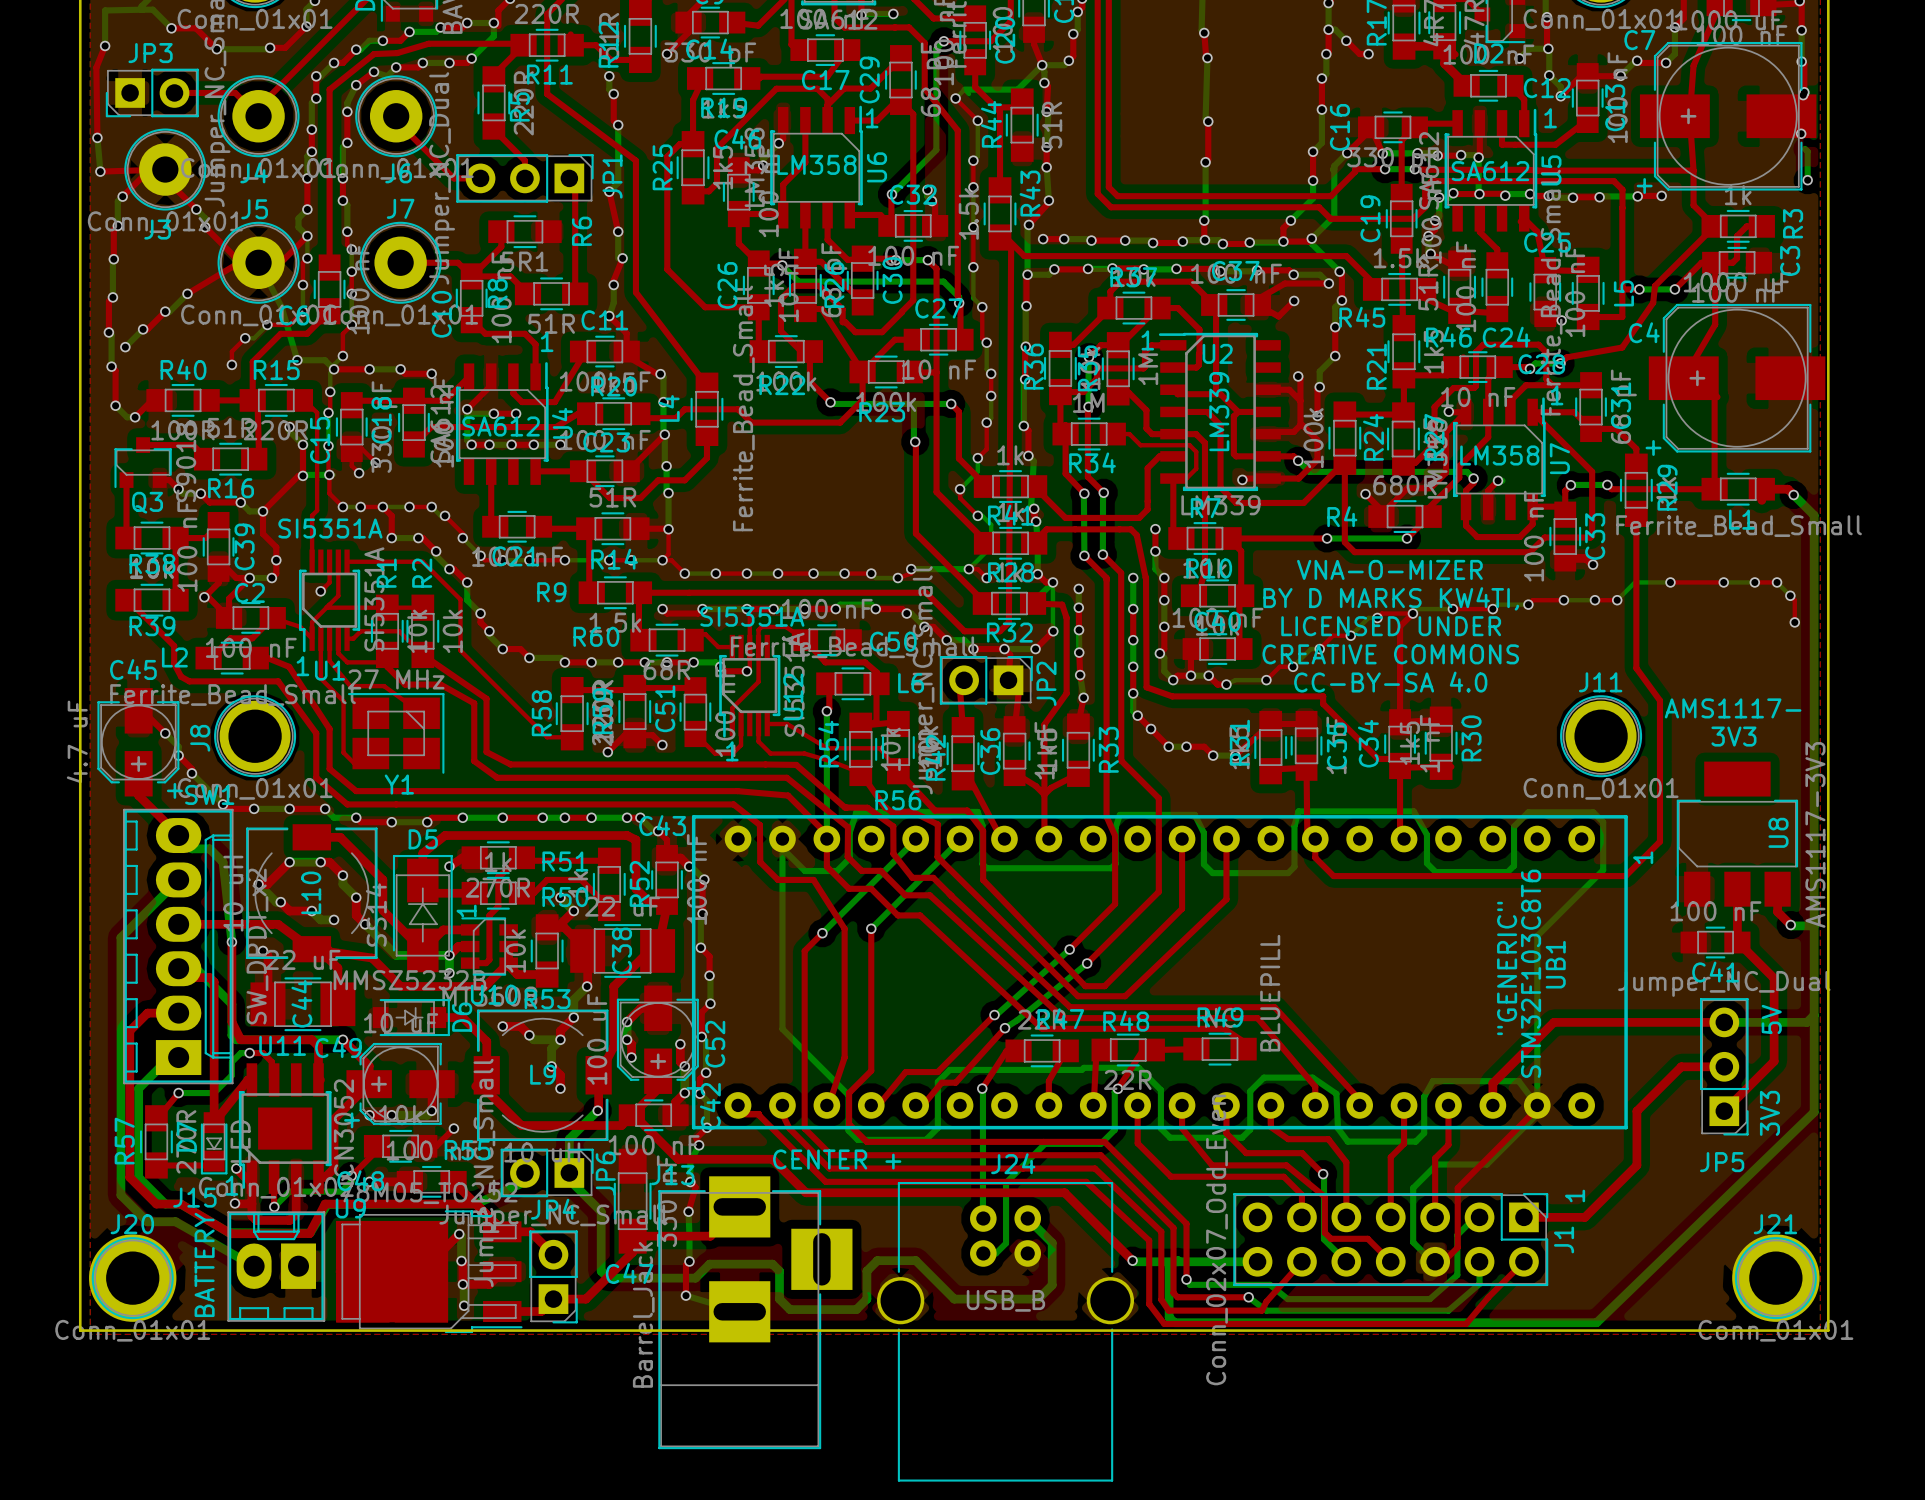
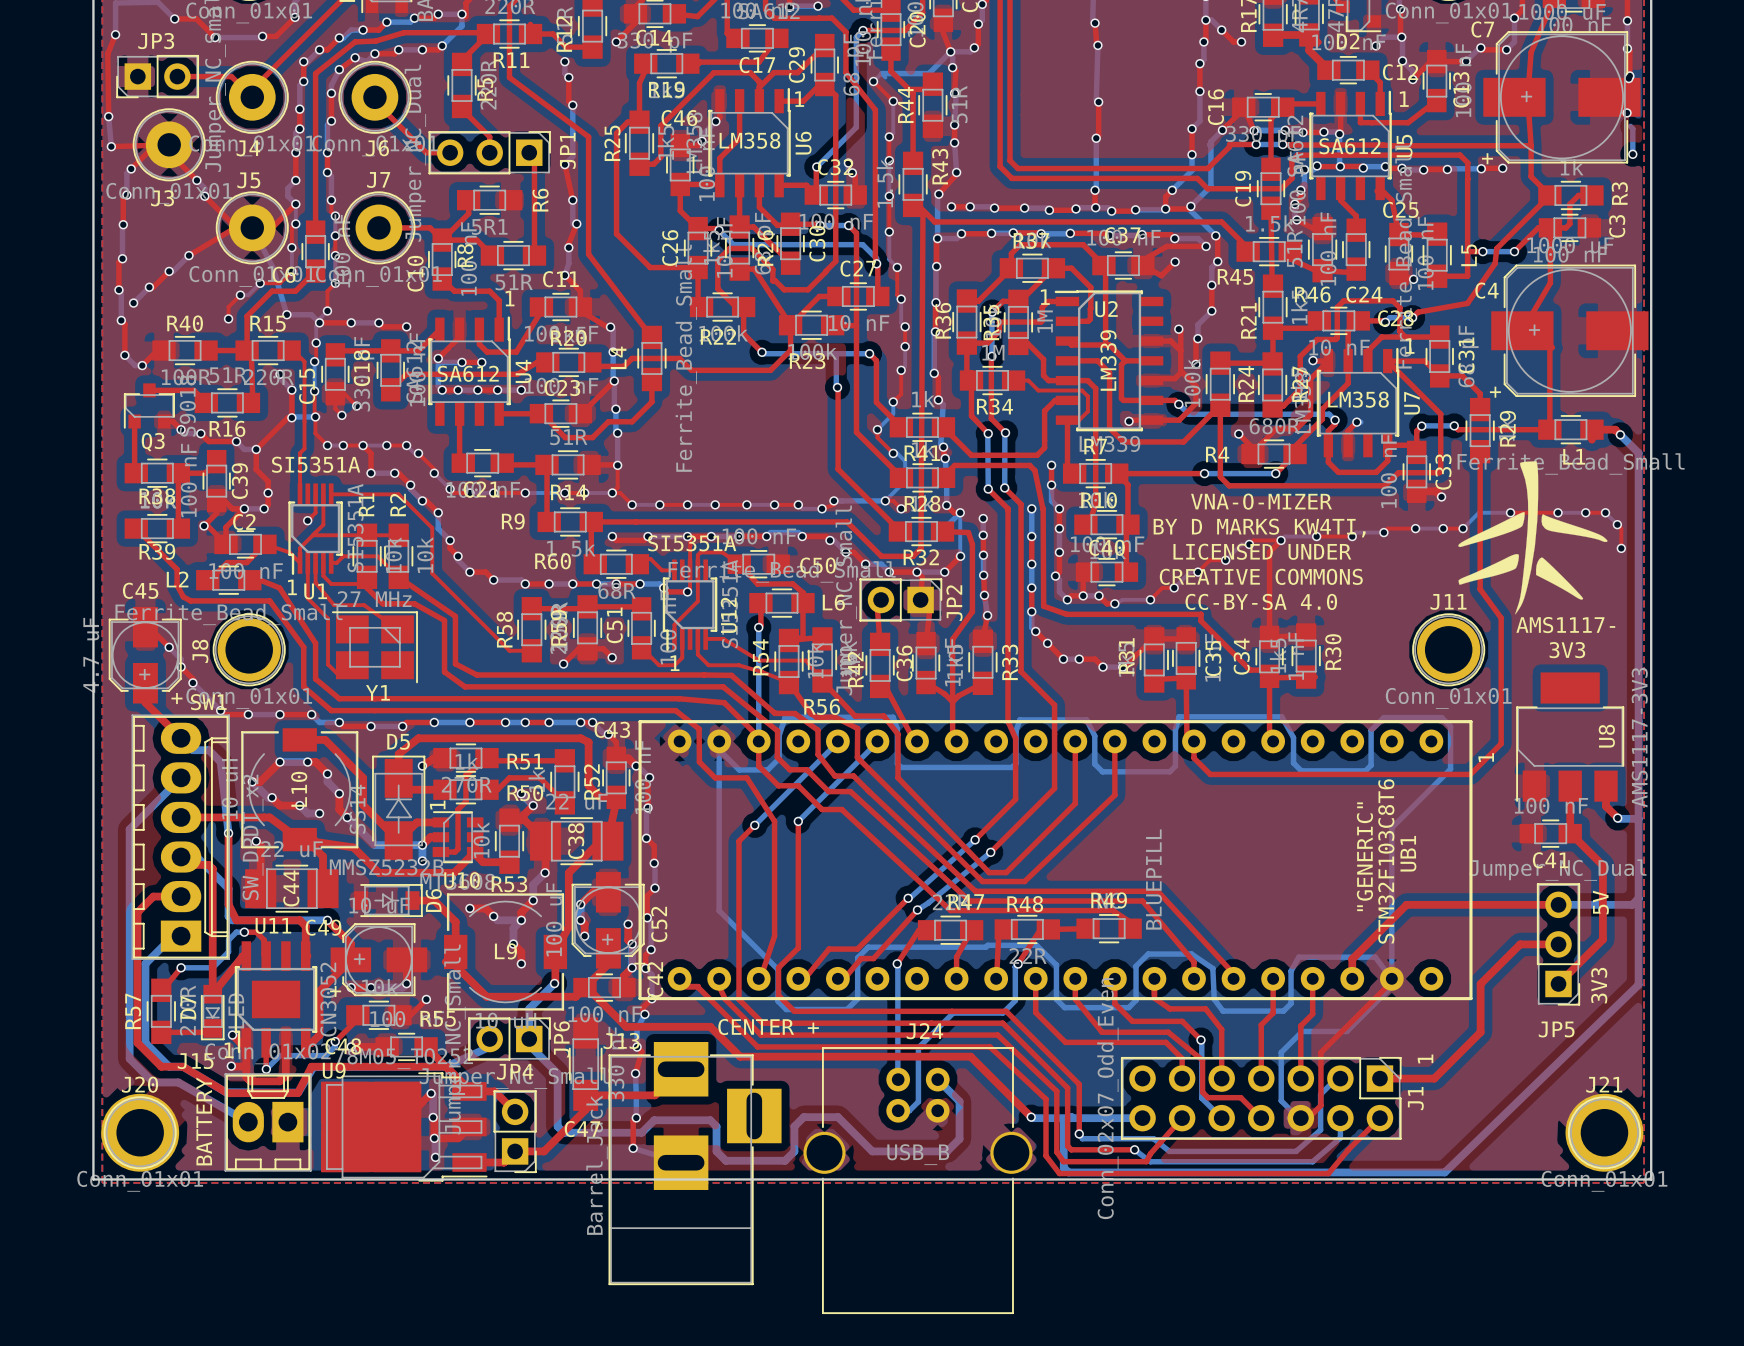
drawing: none -> [1458, 461, 1608, 615]

